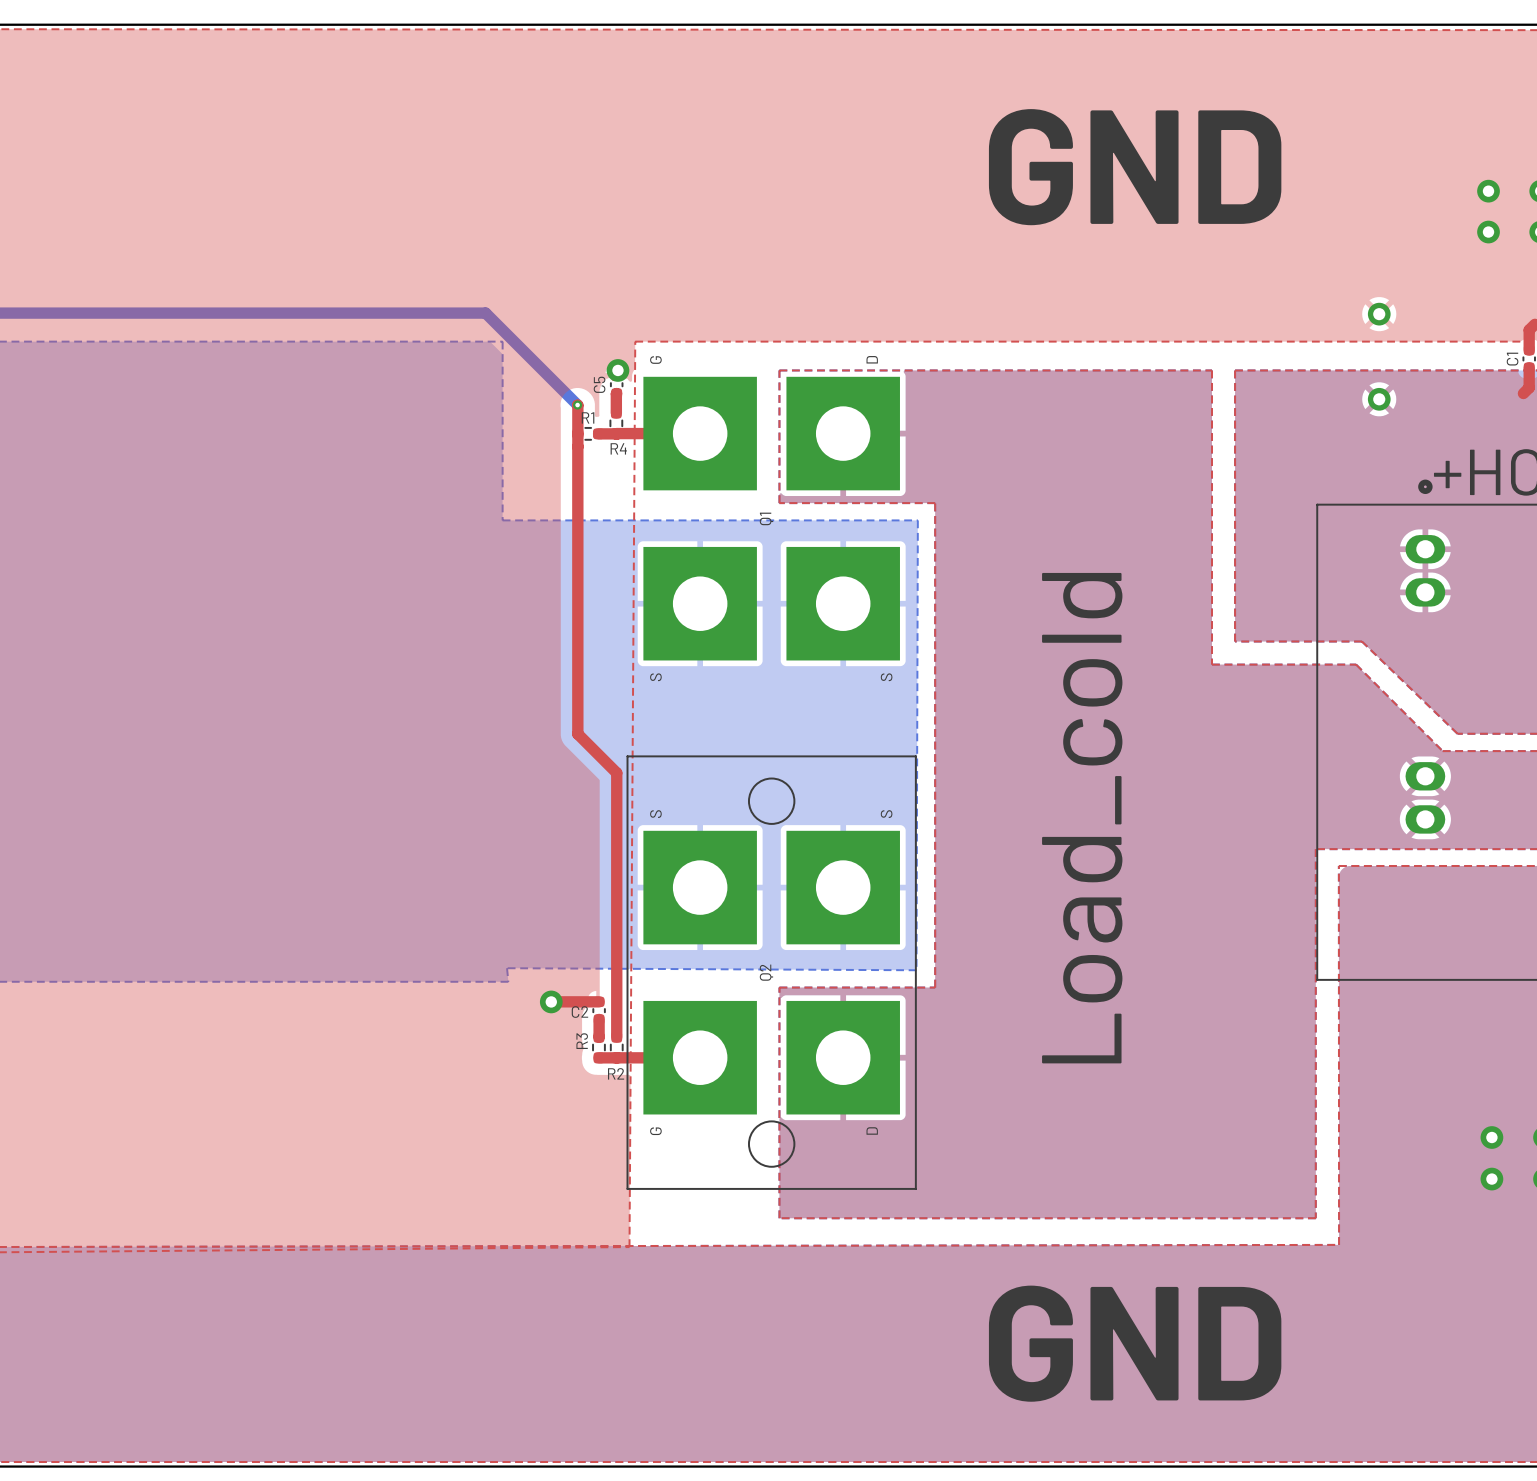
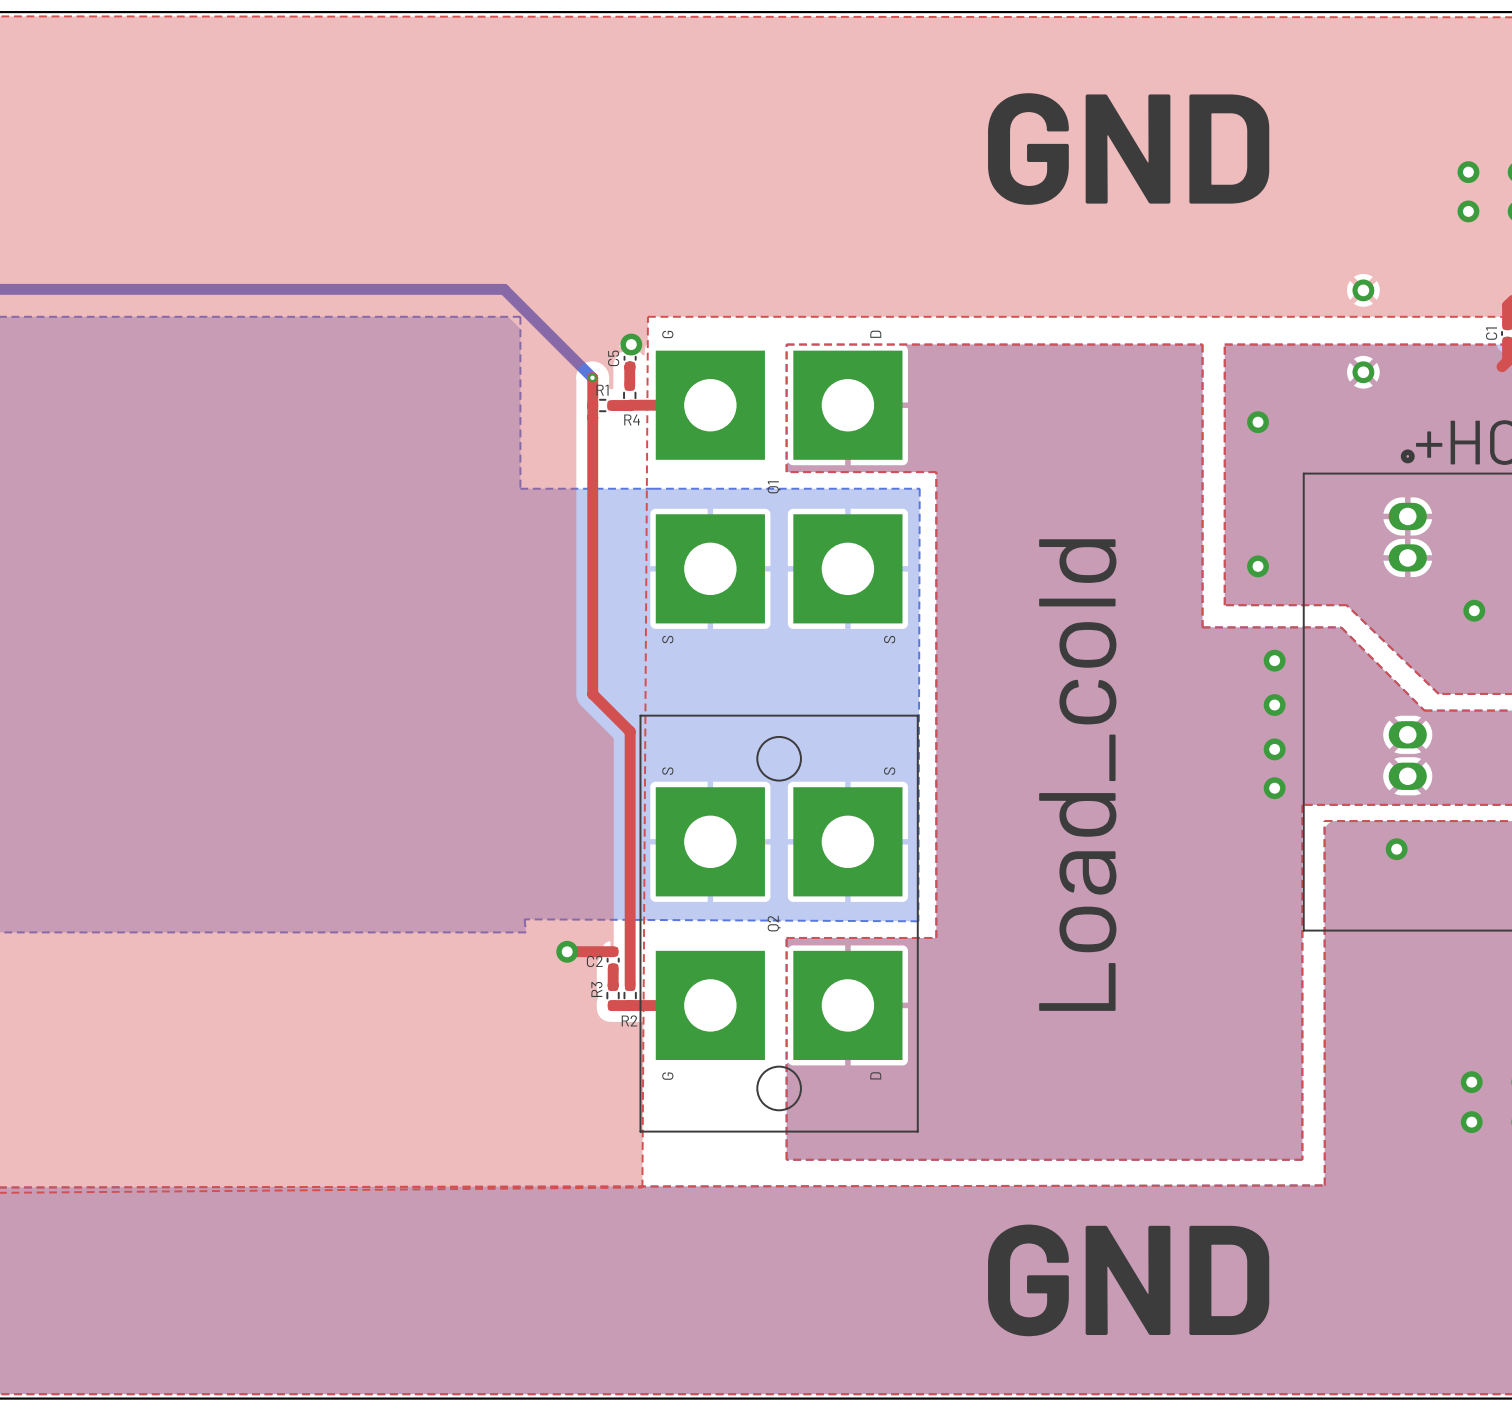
via: none -> (1258, 422)
via: none -> (1258, 566)
via: none -> (1474, 610)
via: none -> (1274, 660)
via: none -> (1274, 705)
via: none -> (1274, 749)
via: none -> (1274, 788)
via: none -> (1396, 849)

